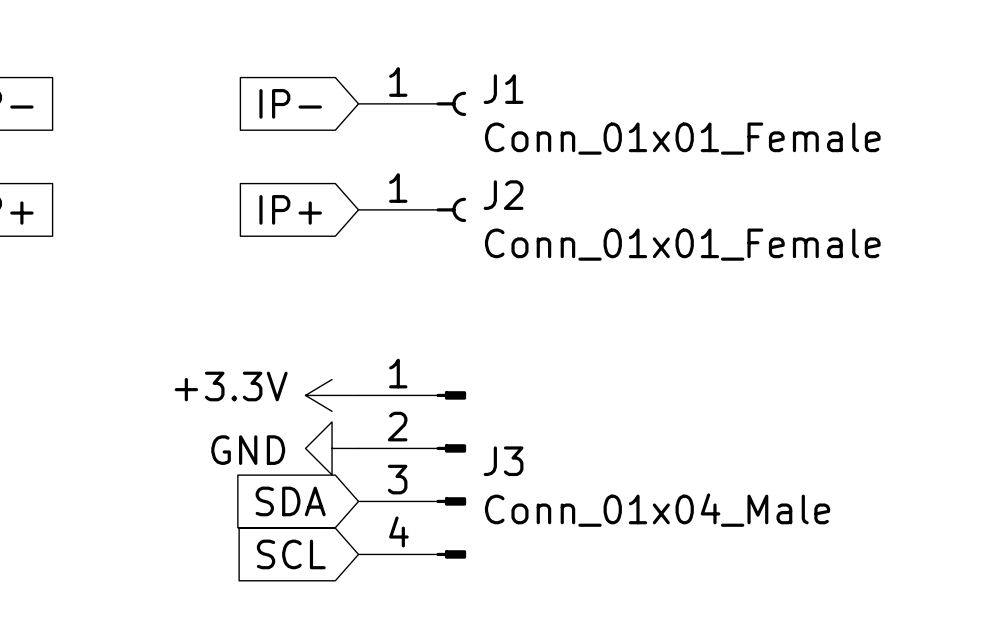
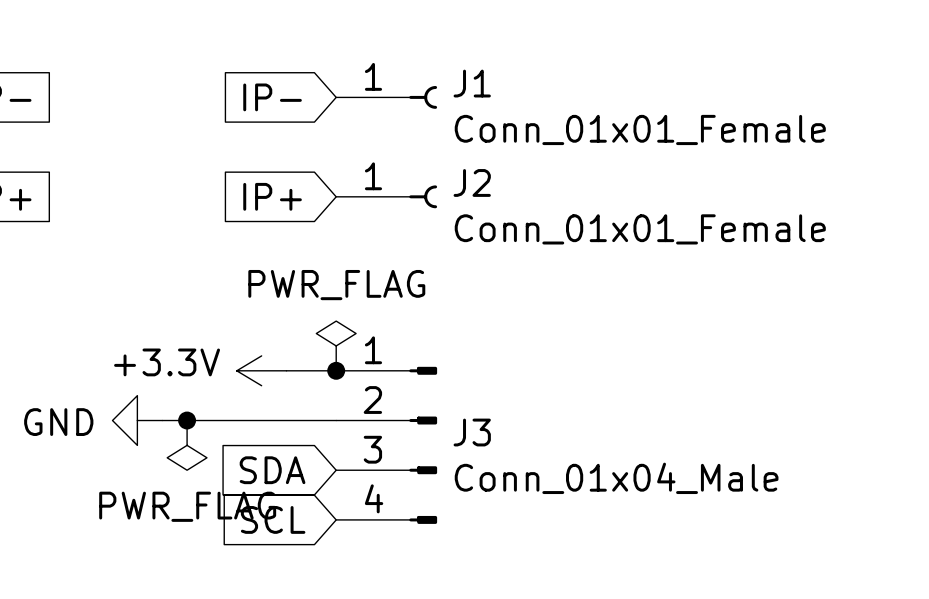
power symbol: none -> PWR_FLAG (336, 345)
power symbol position: +3.3V (332, 395) -> +3.3V (261, 370)
junction: none -> (336, 370)
wire: none -> (162, 420) (336, 420)
junction: none -> (187, 420)
power symbol position: GND (332, 448) -> GND (137, 420)
power symbol: none -> PWR_FLAG (187, 445)

